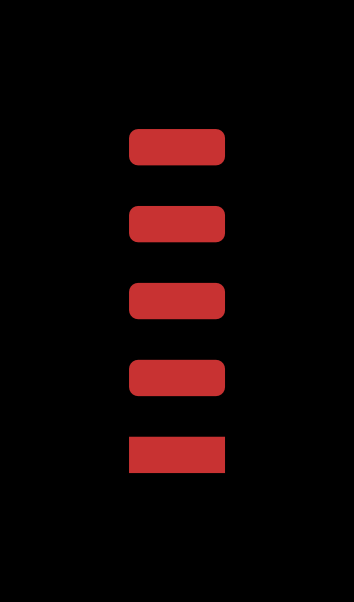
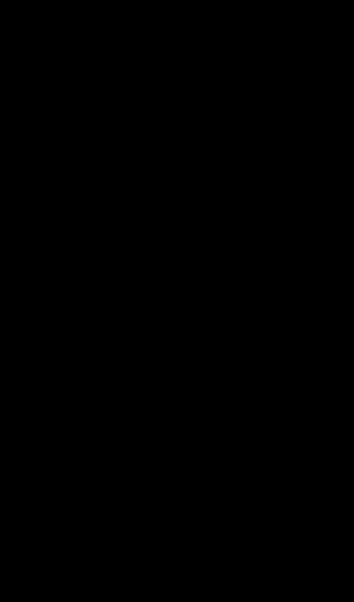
part: (177, 301) -> none

